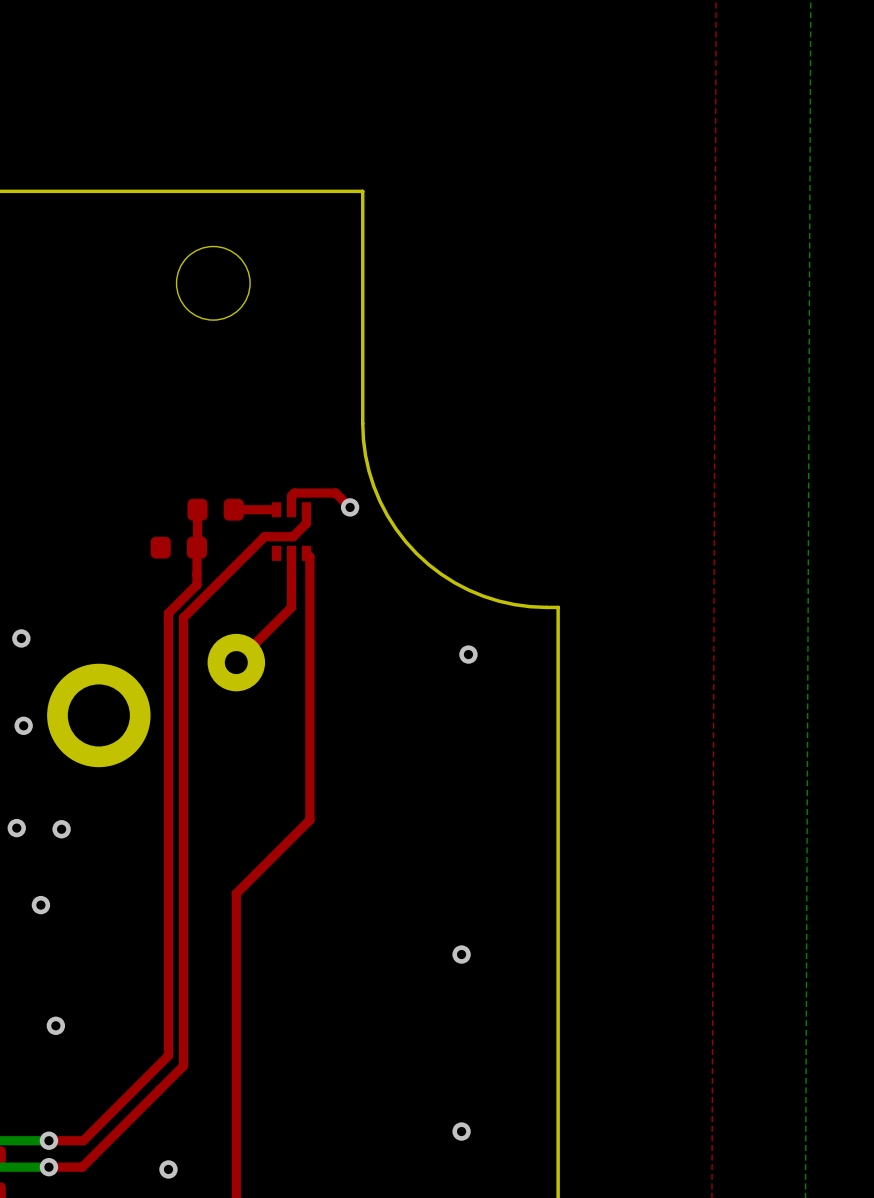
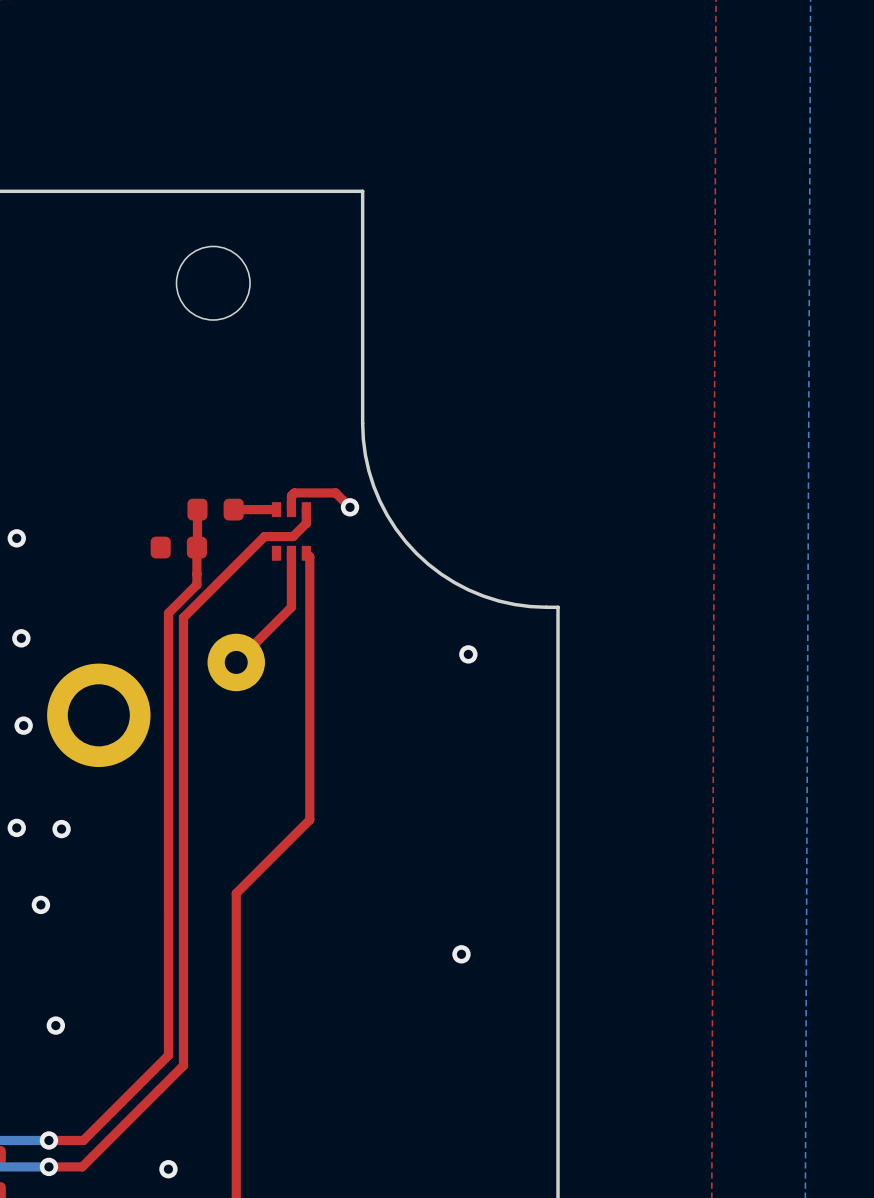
via: none -> (16, 538)
via: (461, 1131) -> none

